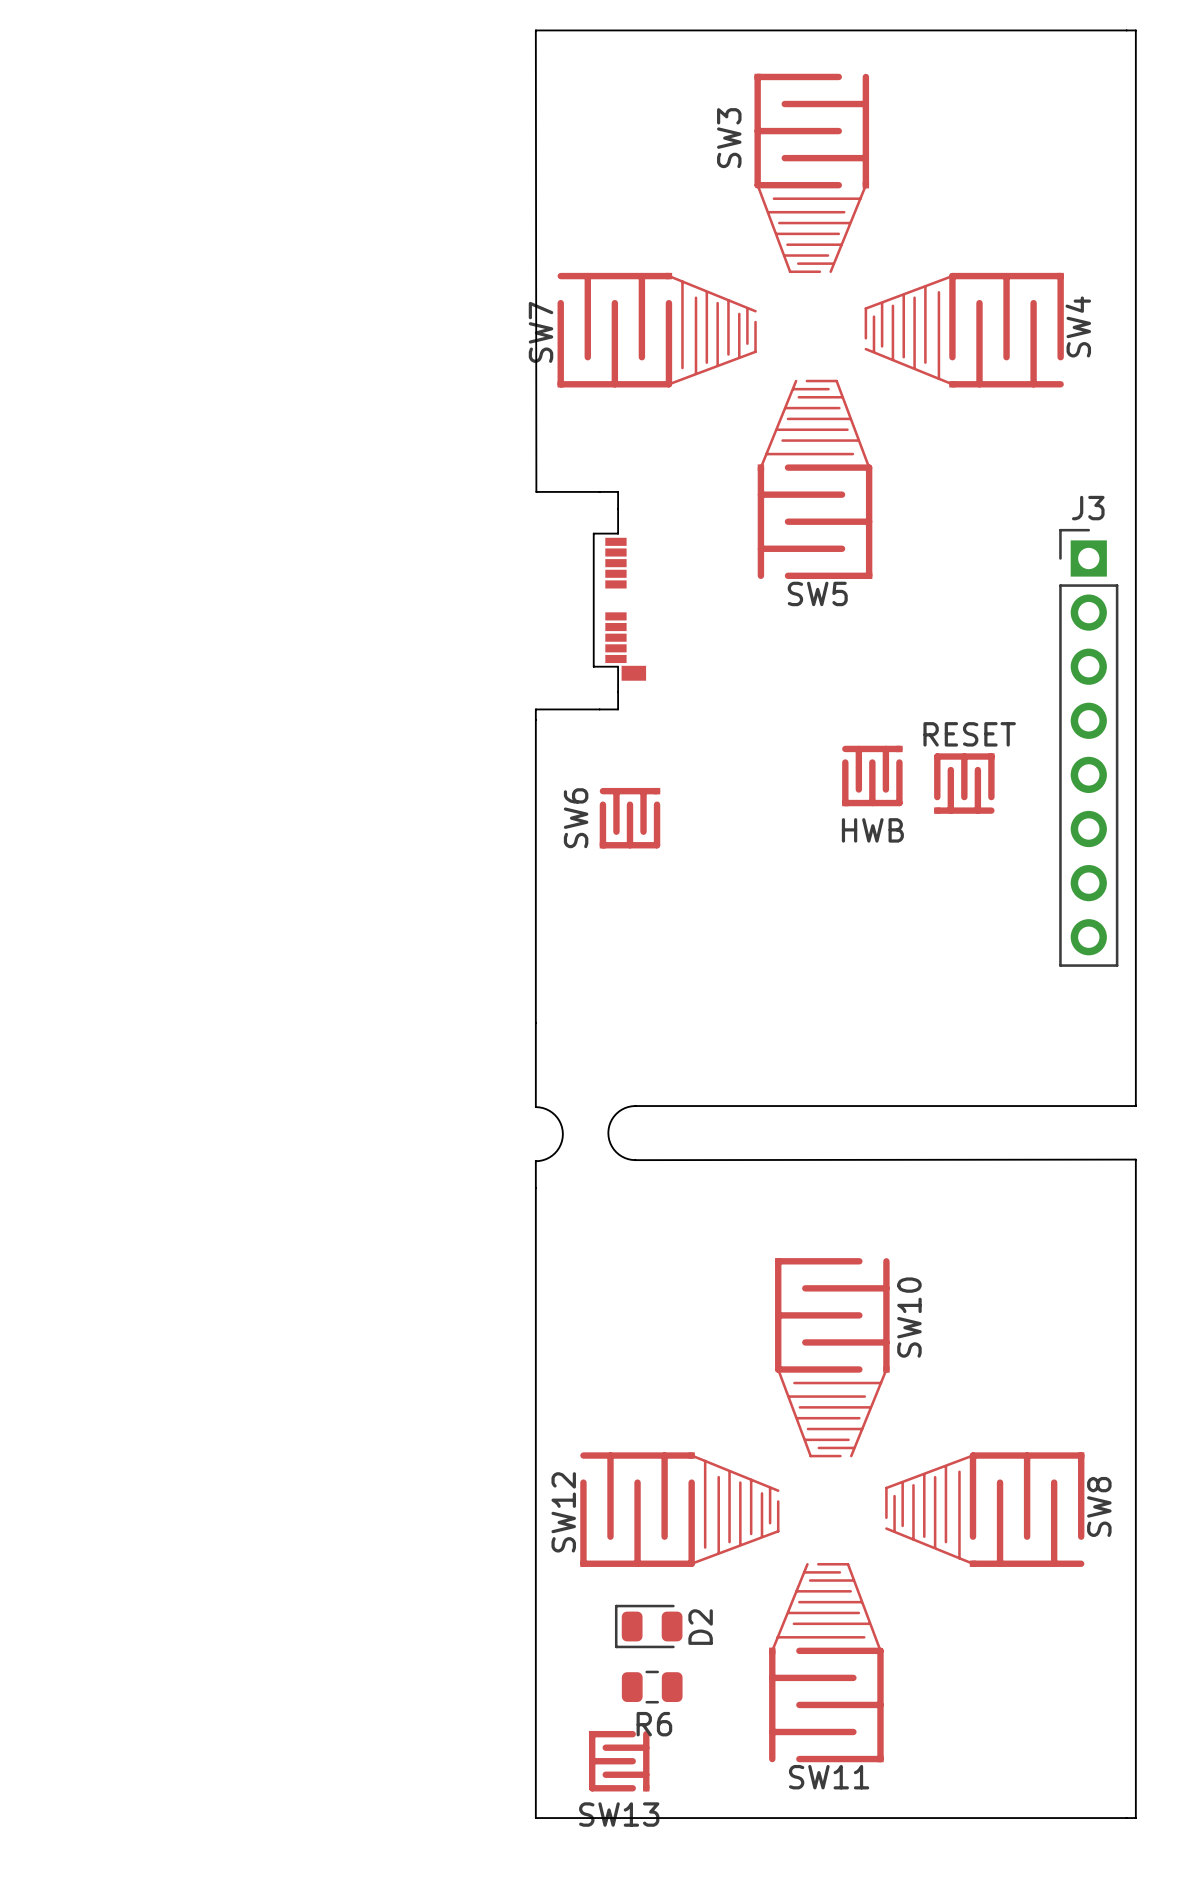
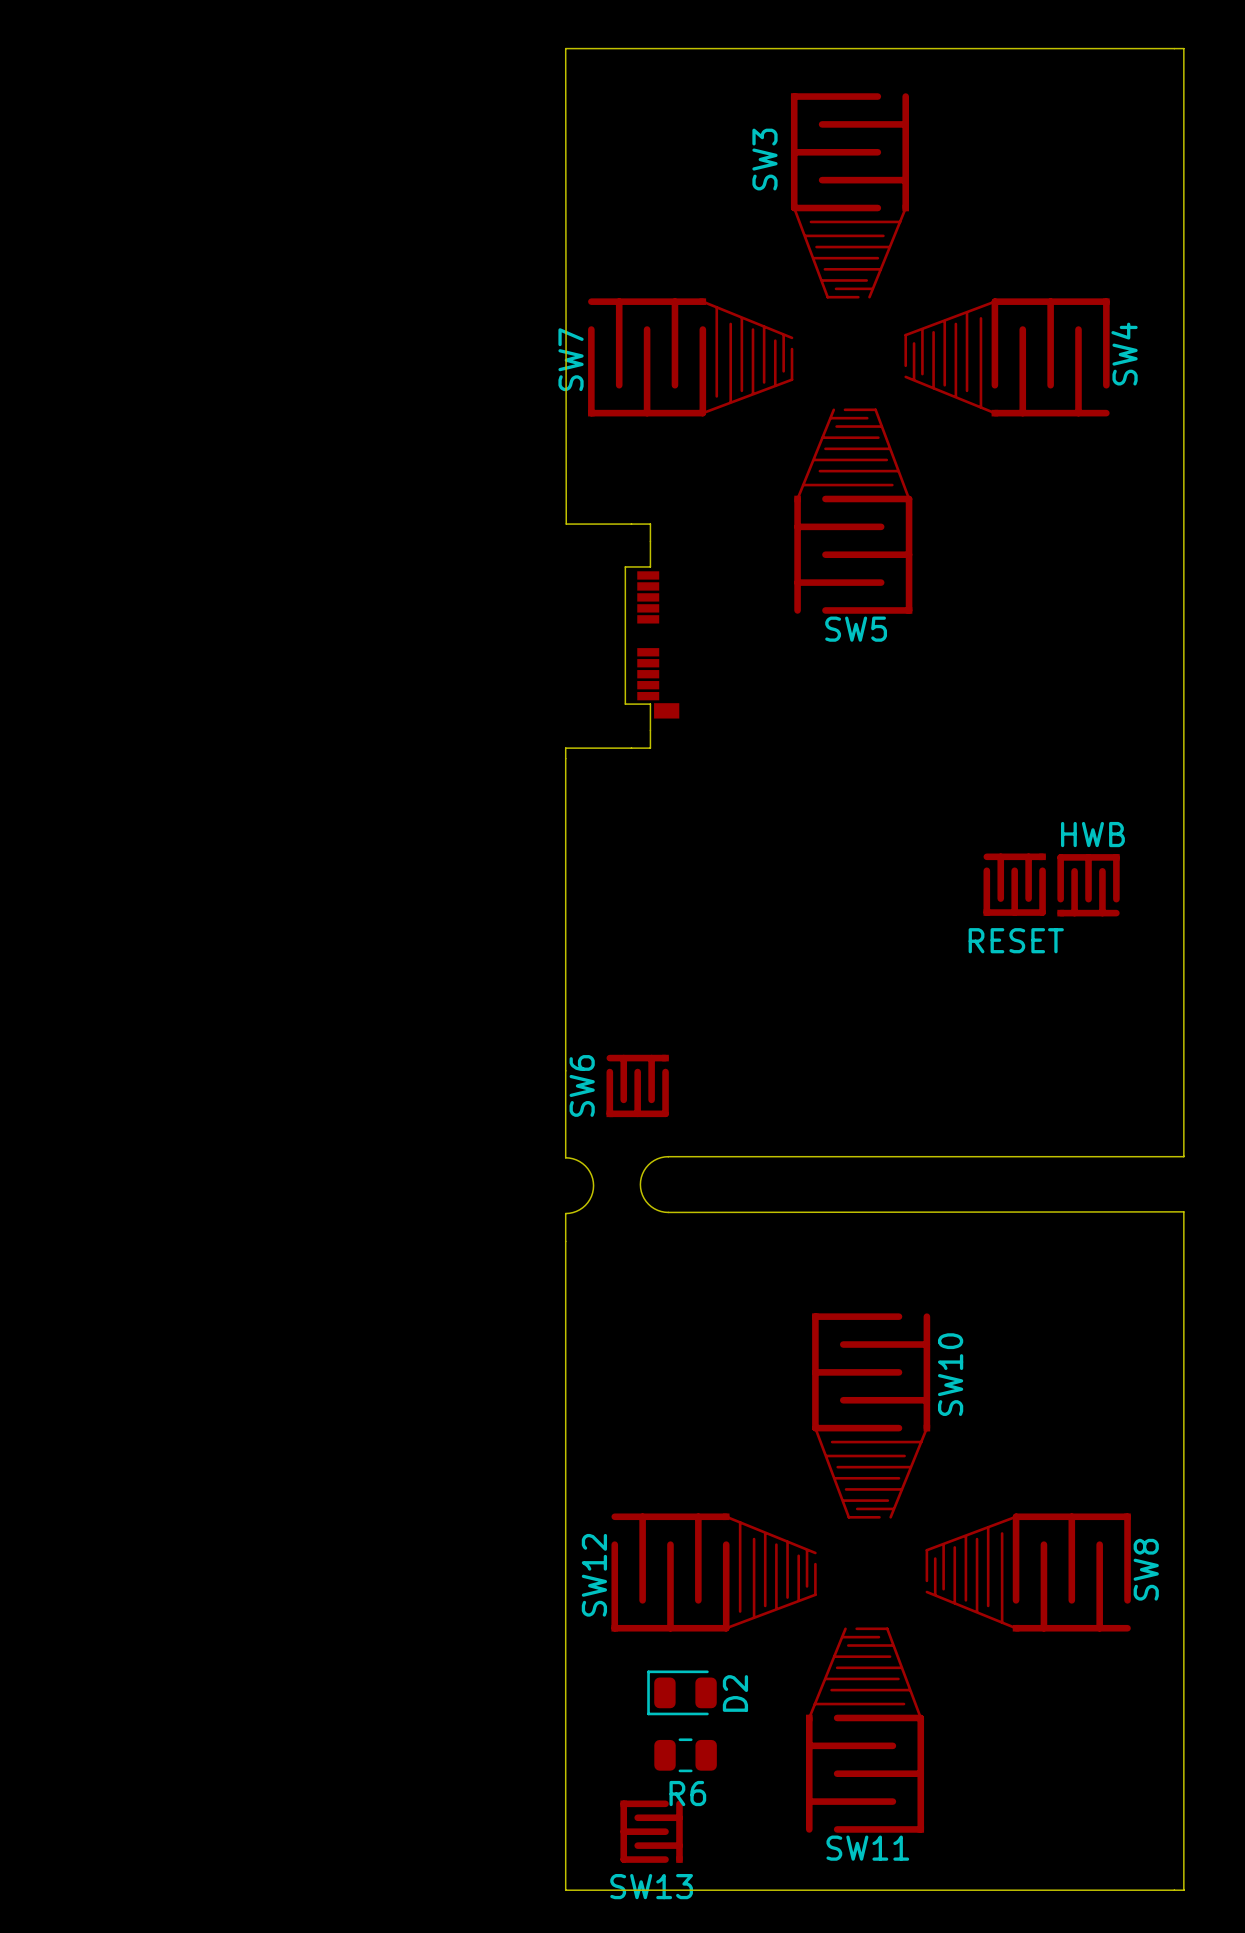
J3: (1088, 747) -> none
HWB rotation: 0° (872, 776) -> 180° (1088, 885)
HWB position: (872, 776) -> (1088, 885)
RESET rotation: 0° (964, 783) -> 180° (1014, 884)
RESET position: (964, 783) -> (1014, 884)
SW6 position: (629, 818) -> (637, 1085)

